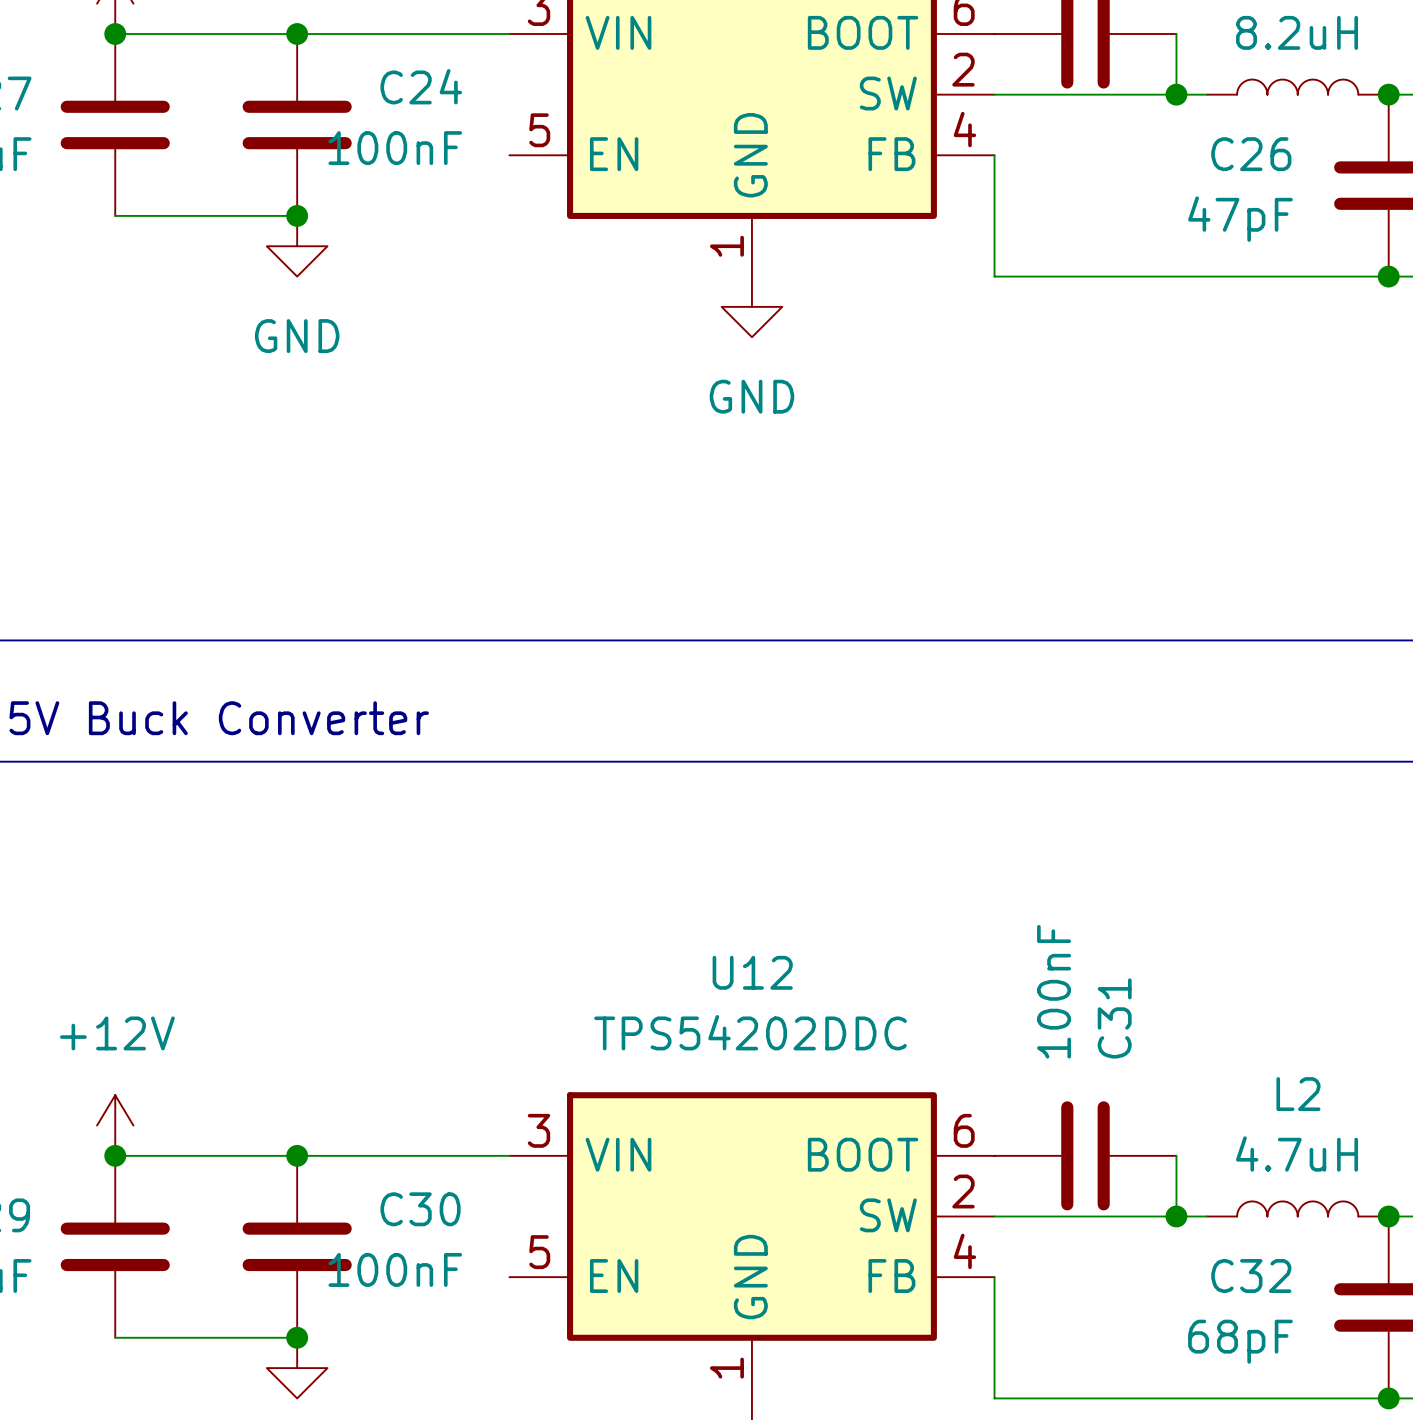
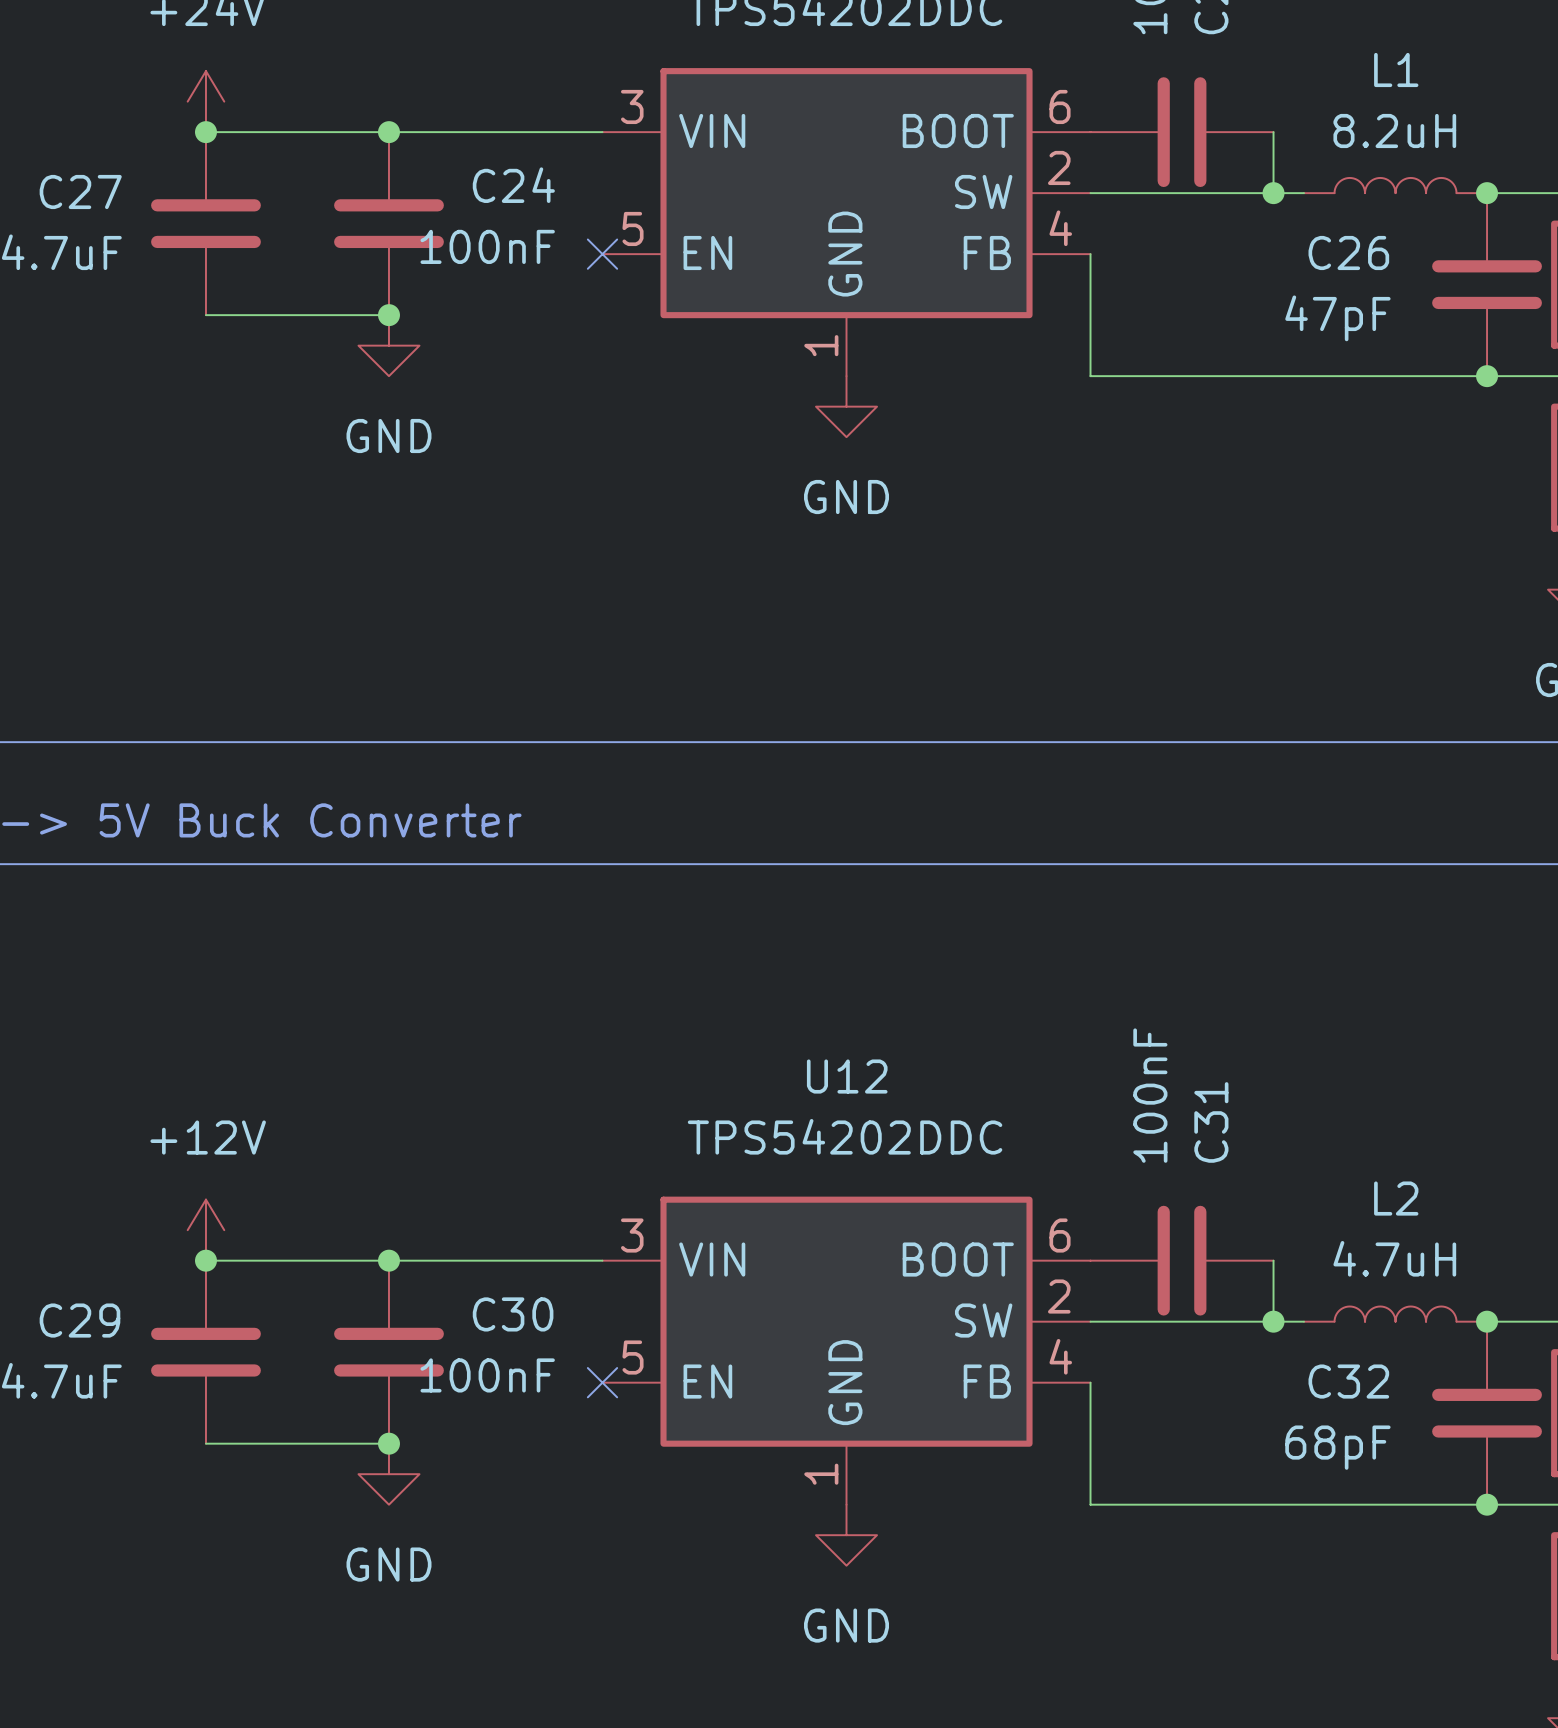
no-connect mark: none -> (602, 254)
no-connect mark: none -> (602, 1382)

